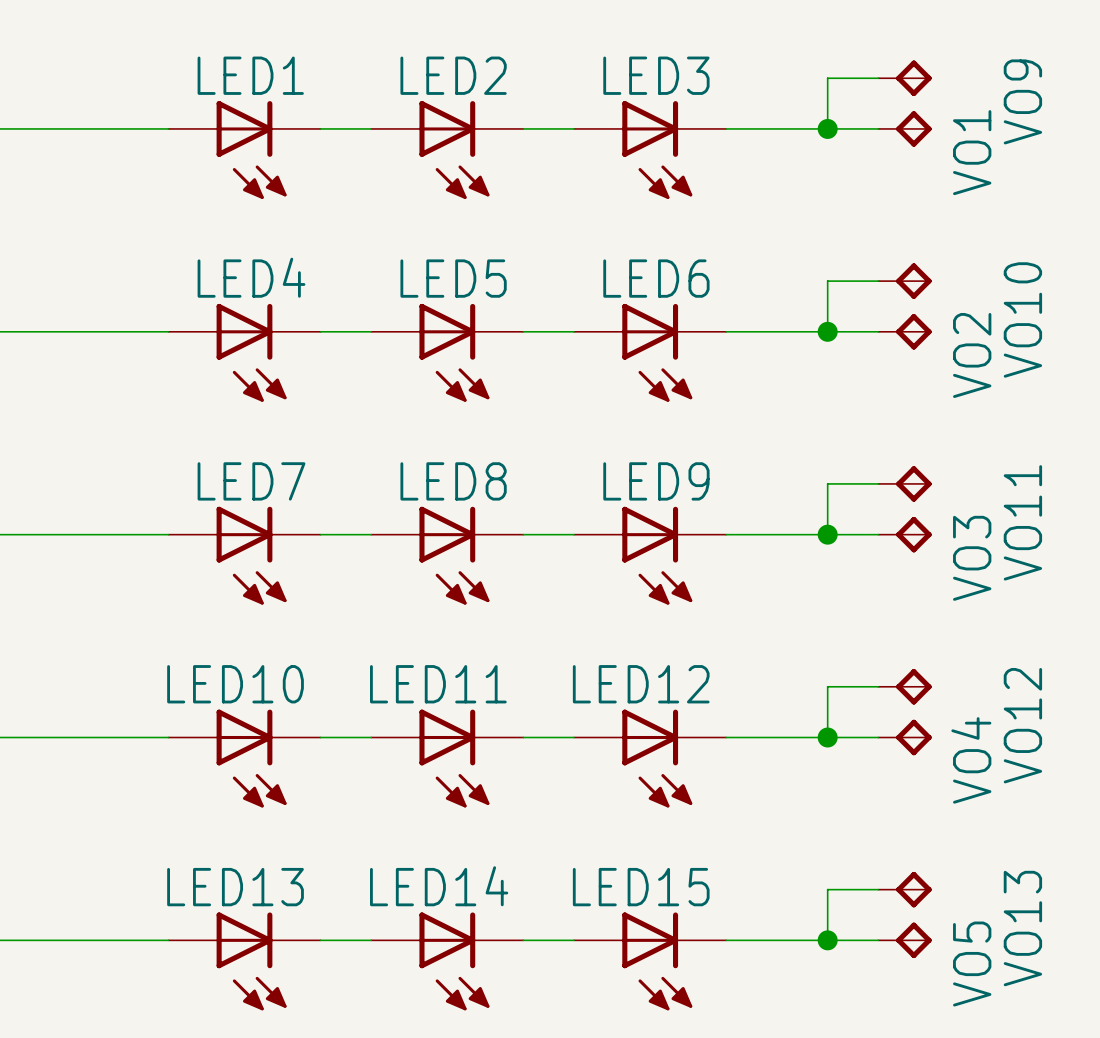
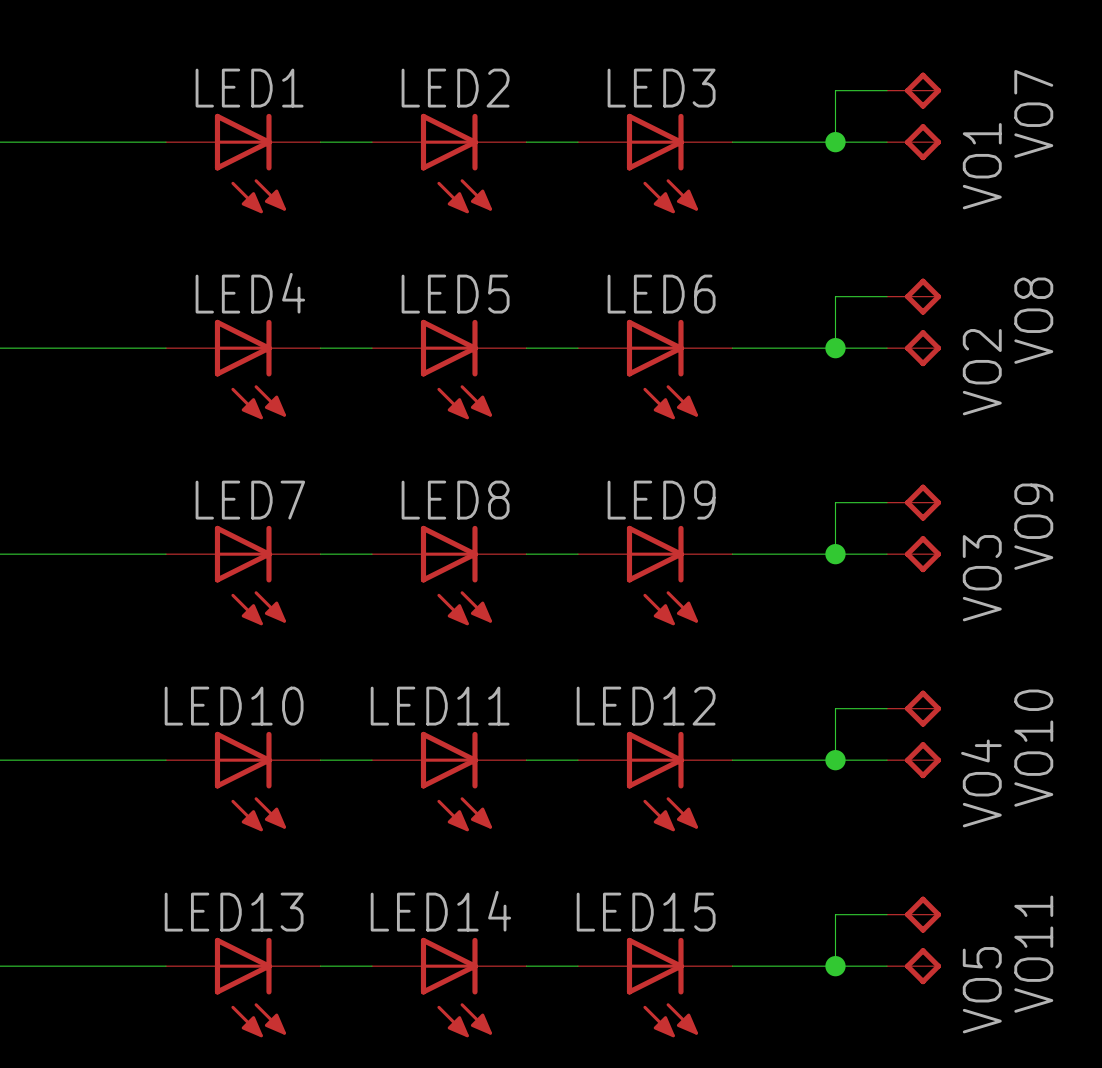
VO9 name: VO9 (1022, 101) -> VO7 (1033, 113)
VO10 name: VO10 (1022, 319) -> VO8 (1033, 320)
VO11 name: VO11 (1022, 522) -> VO9 (1033, 526)
VO12 name: VO12 (1022, 725) -> VO10 (1033, 748)
VO13 name: VO13 (1022, 928) -> VO11 (1033, 954)

